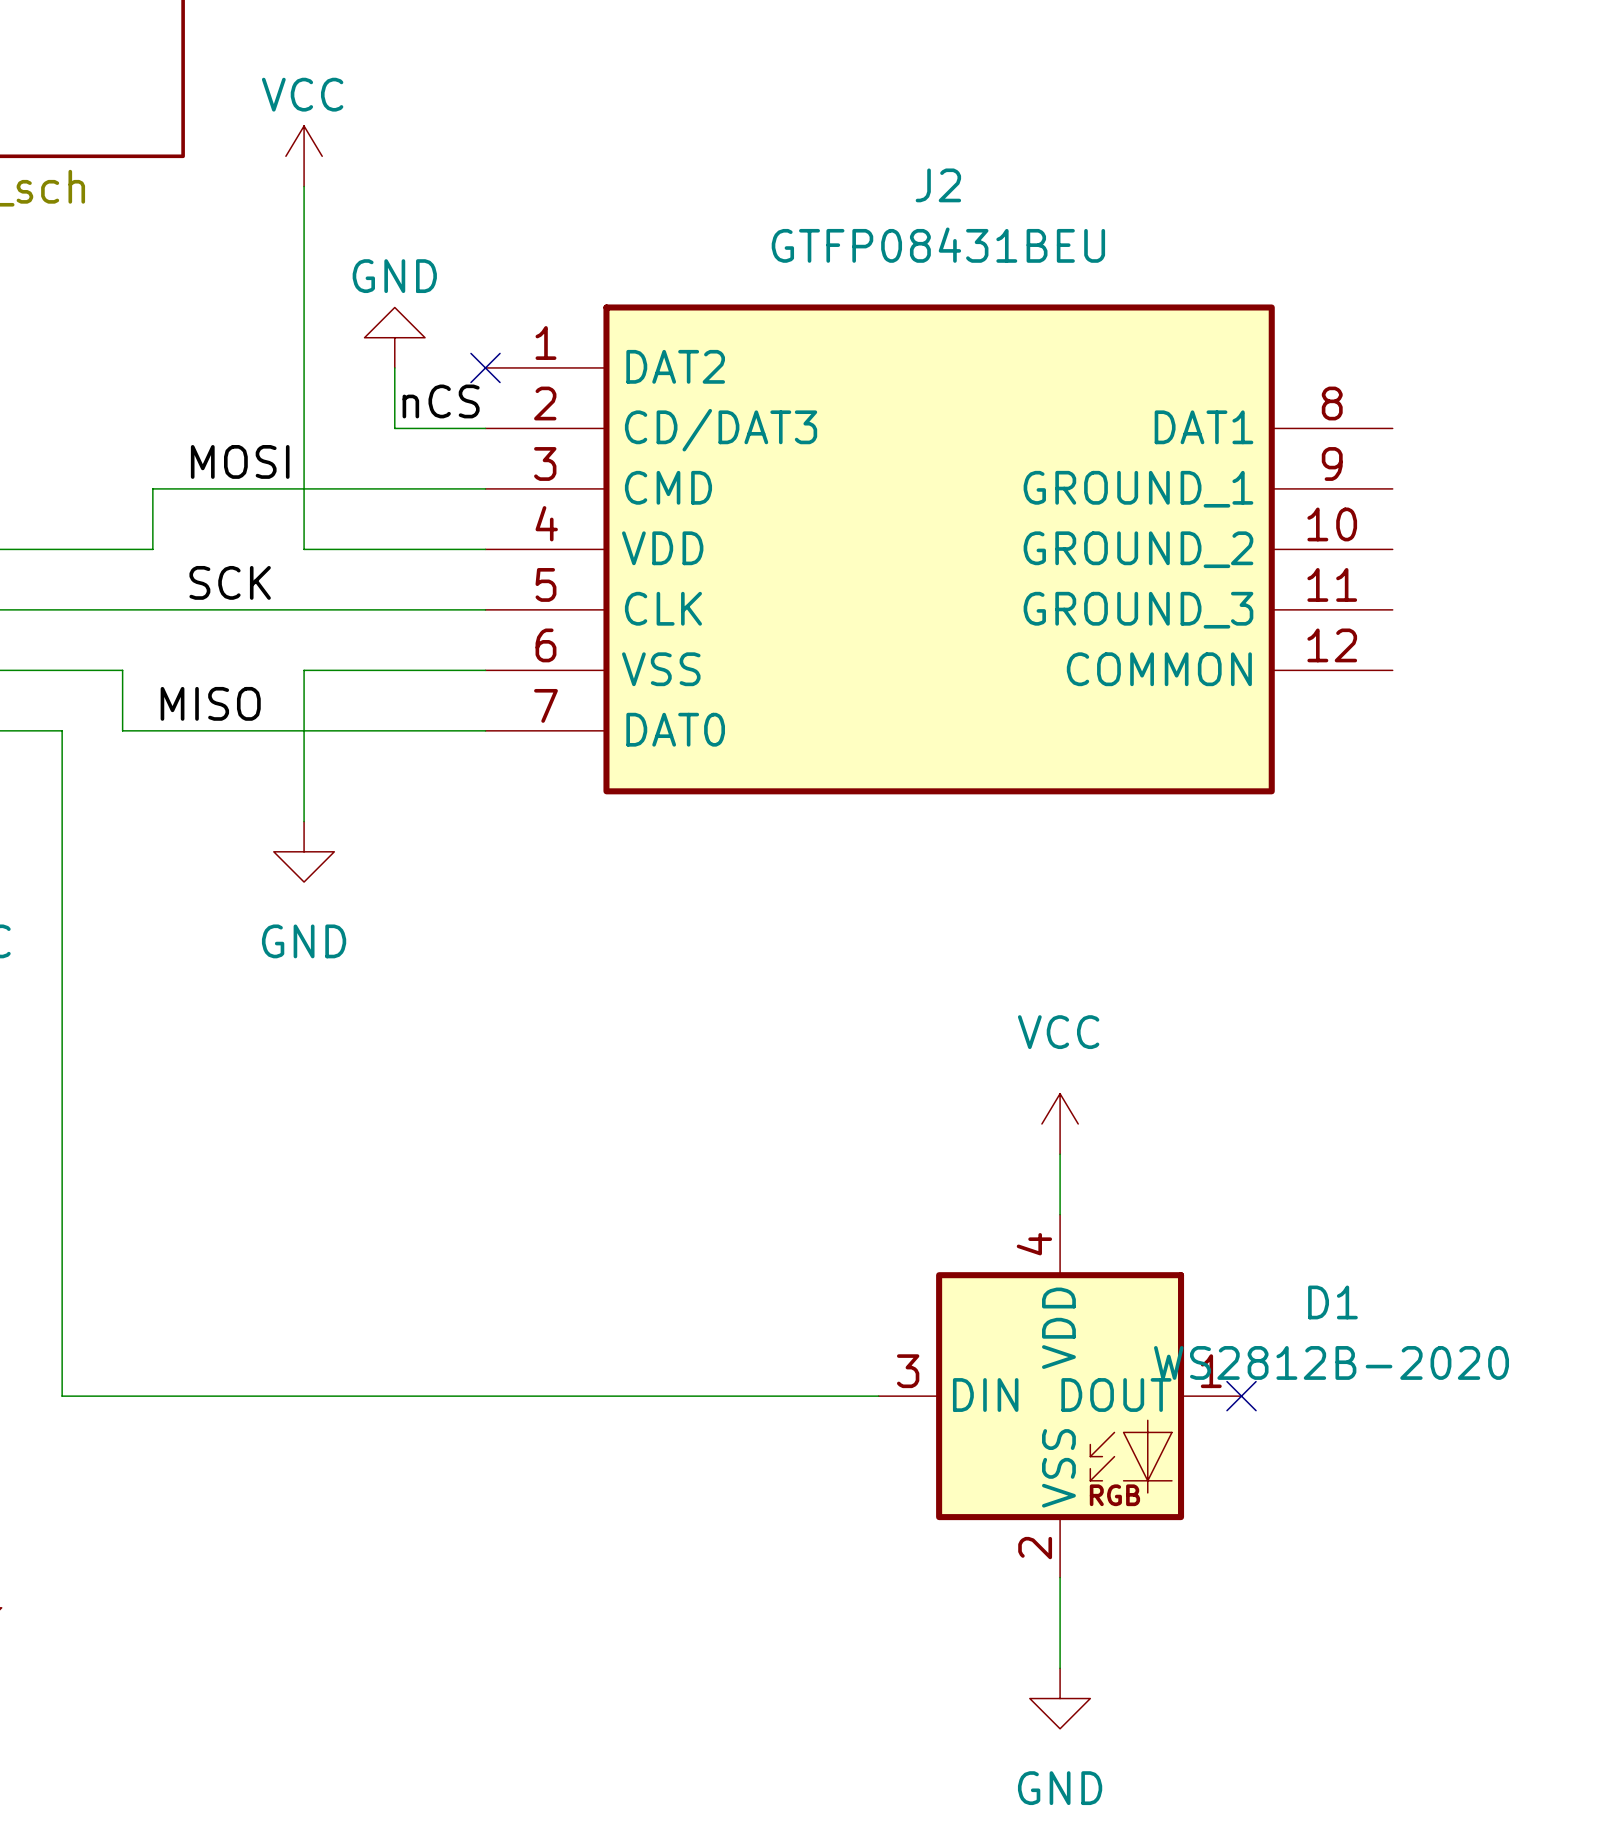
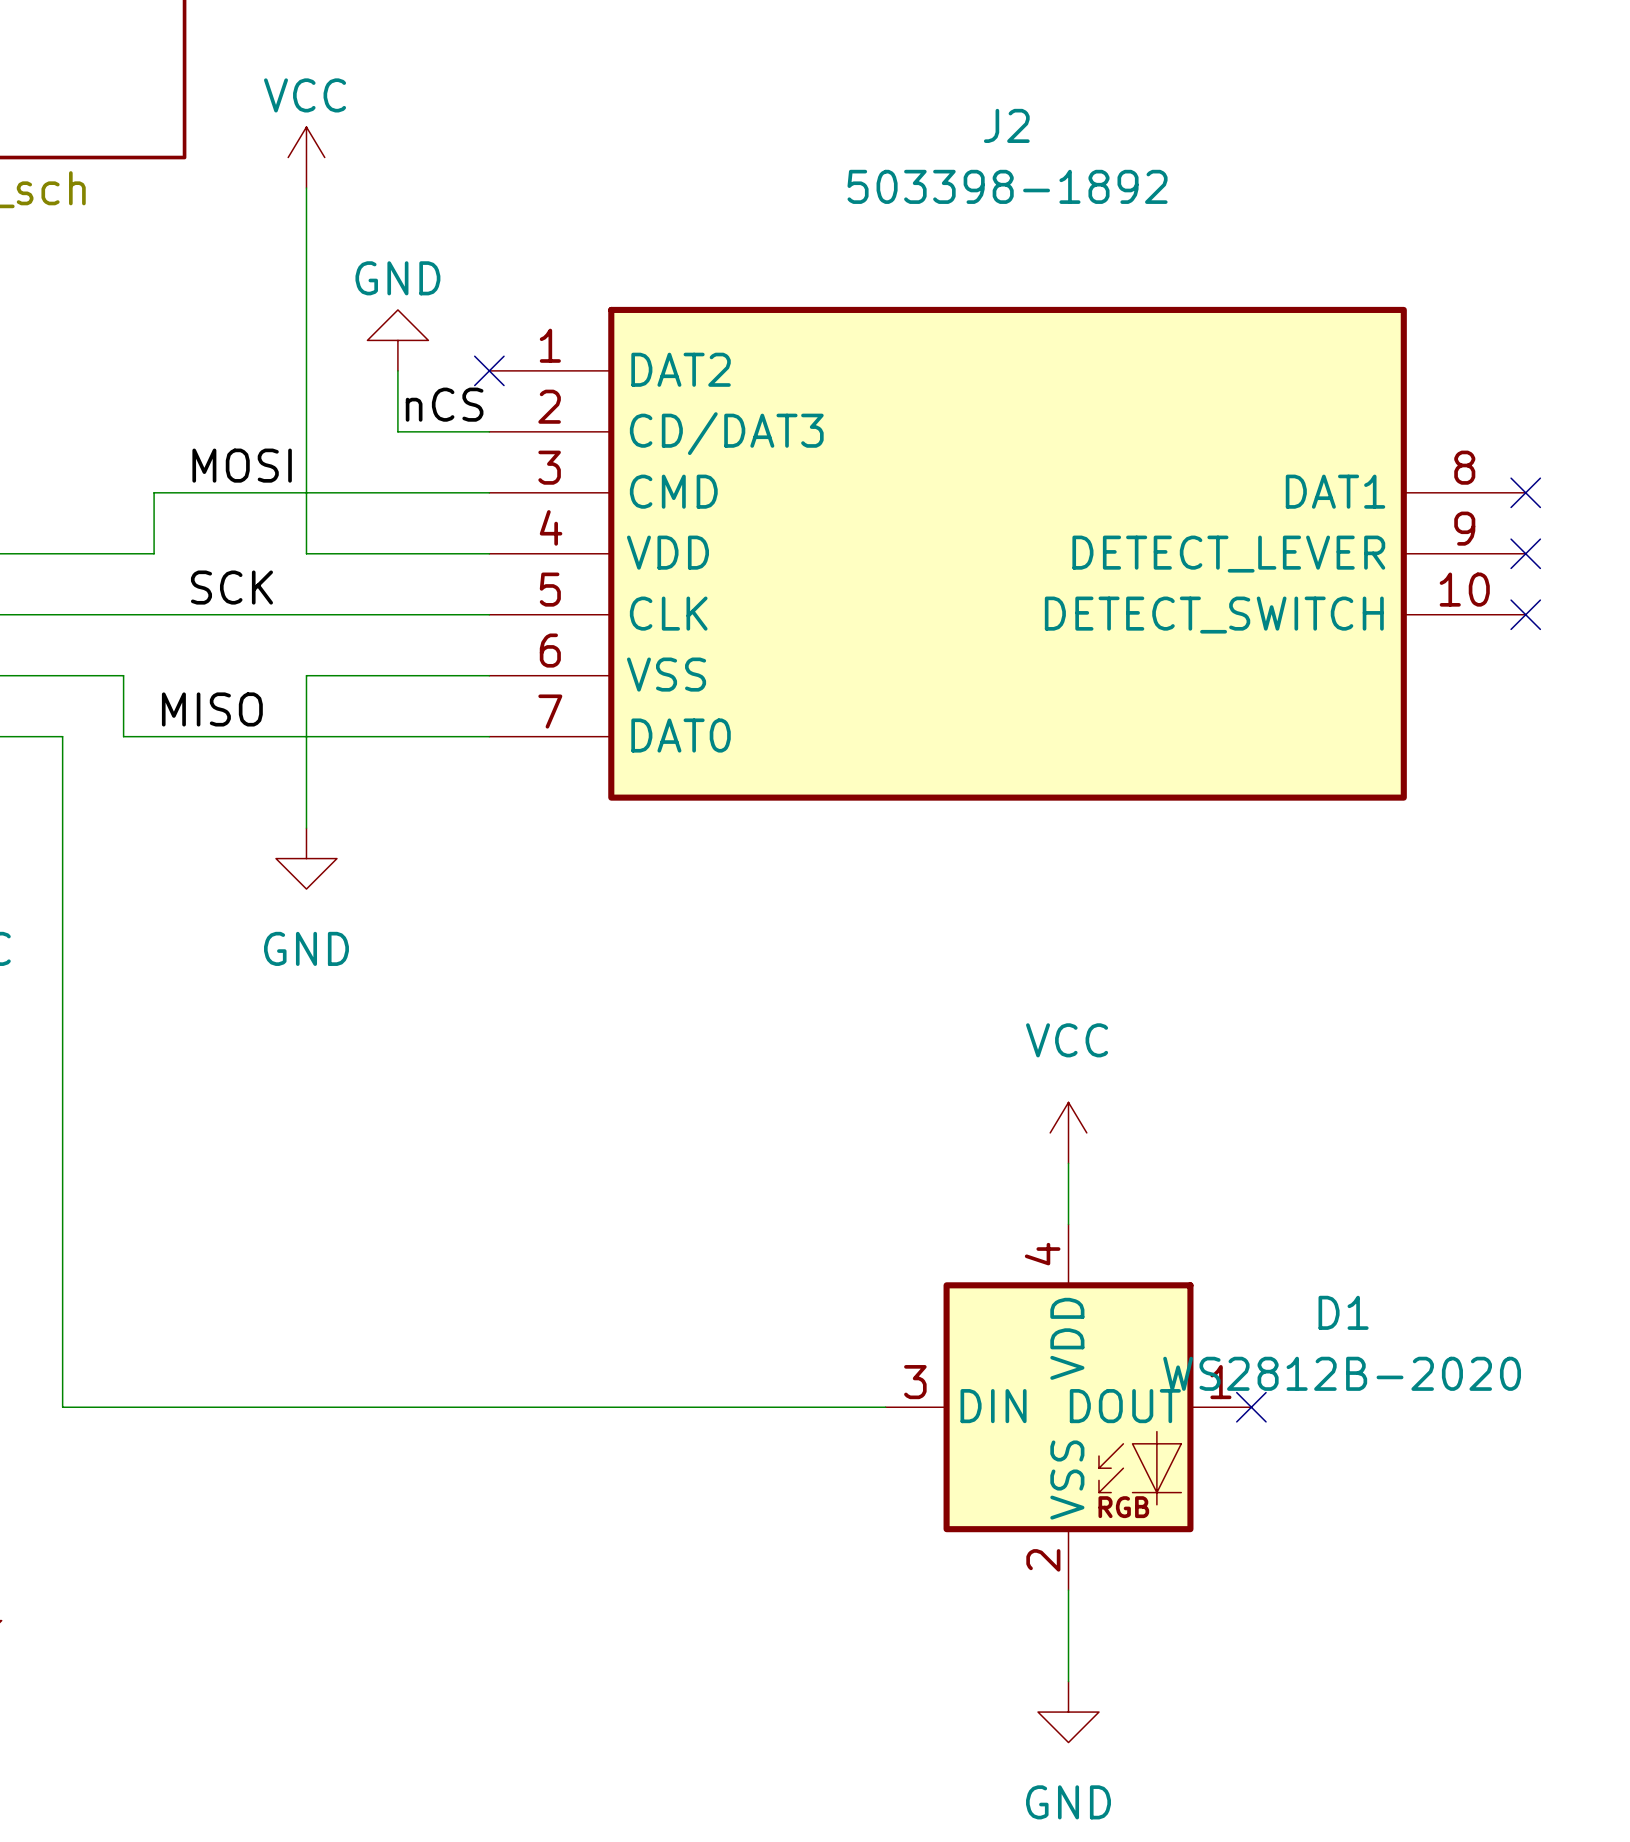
J2 name position: J2 (938, 185) -> J2 (1006, 125)
J2 value: GTFP08431BEU (938, 245) -> 503398-1892 (1007, 186)
J2 symbol: [485, 304, 1393, 795] -> [489, 306, 1526, 801]
no-connect mark: none -> (1525, 492)
no-connect mark: none -> (1525, 553)
no-connect mark: none -> (1525, 614)

